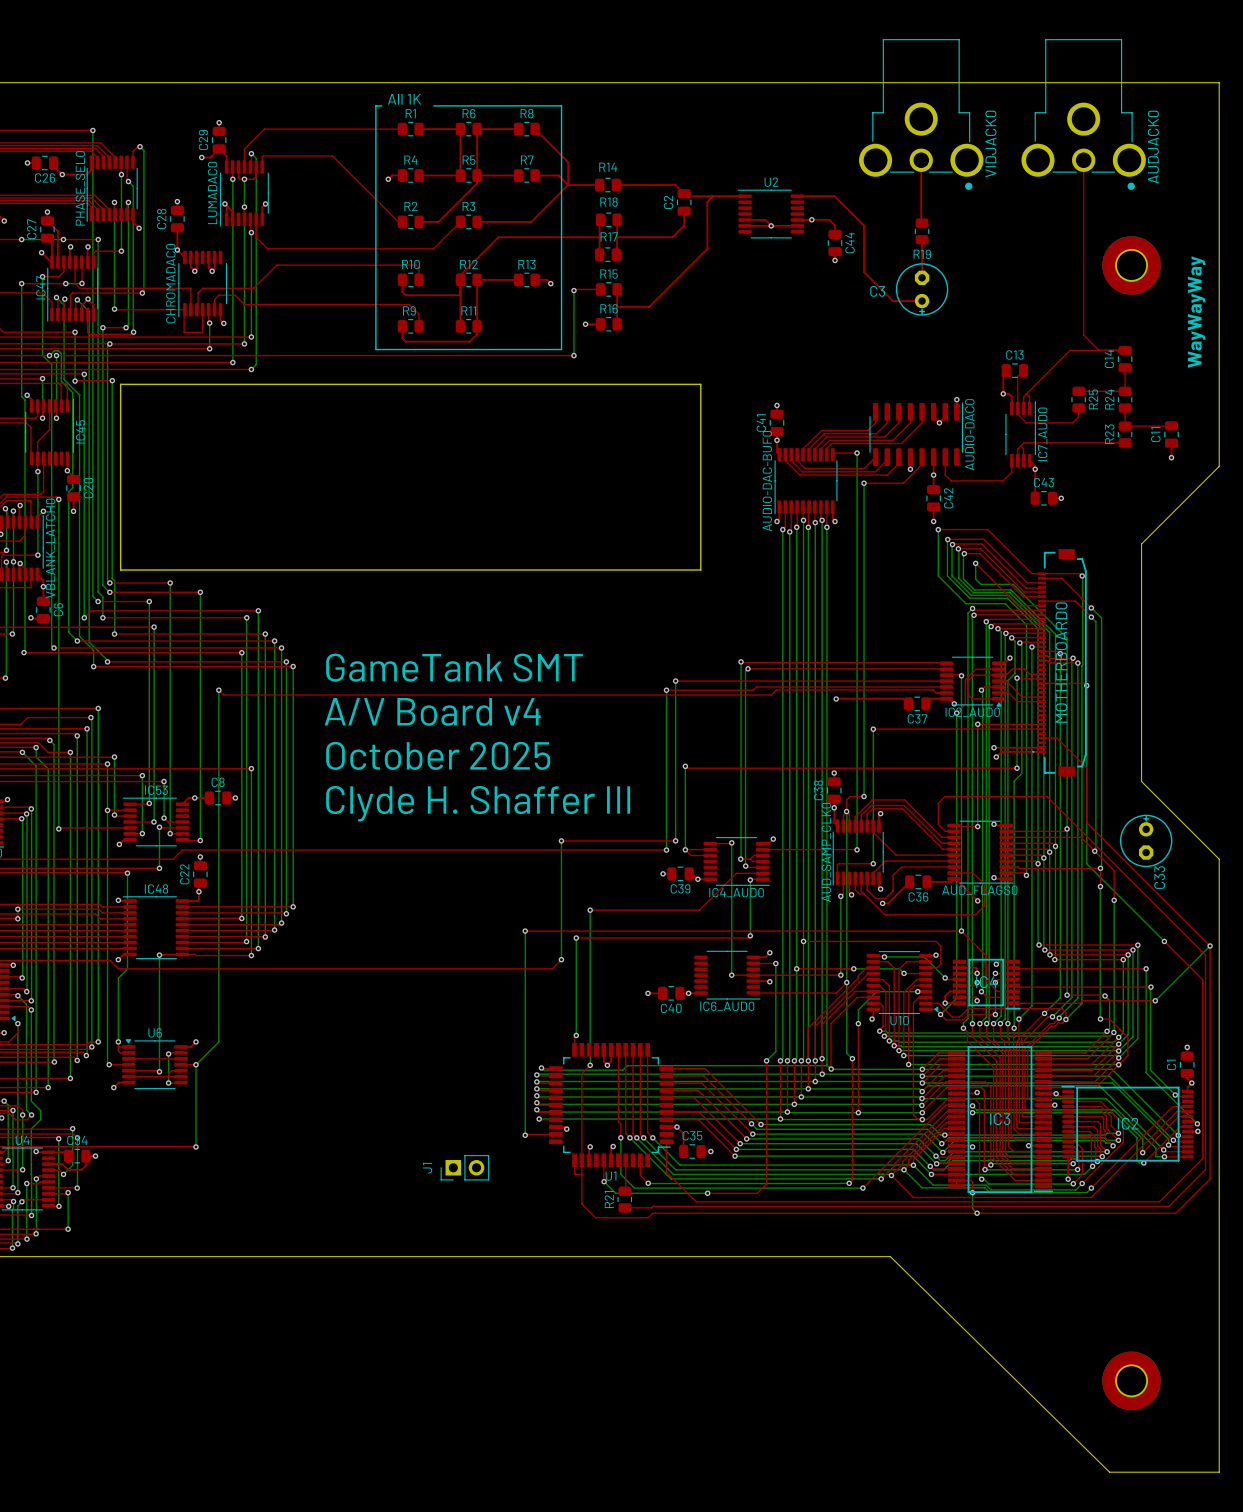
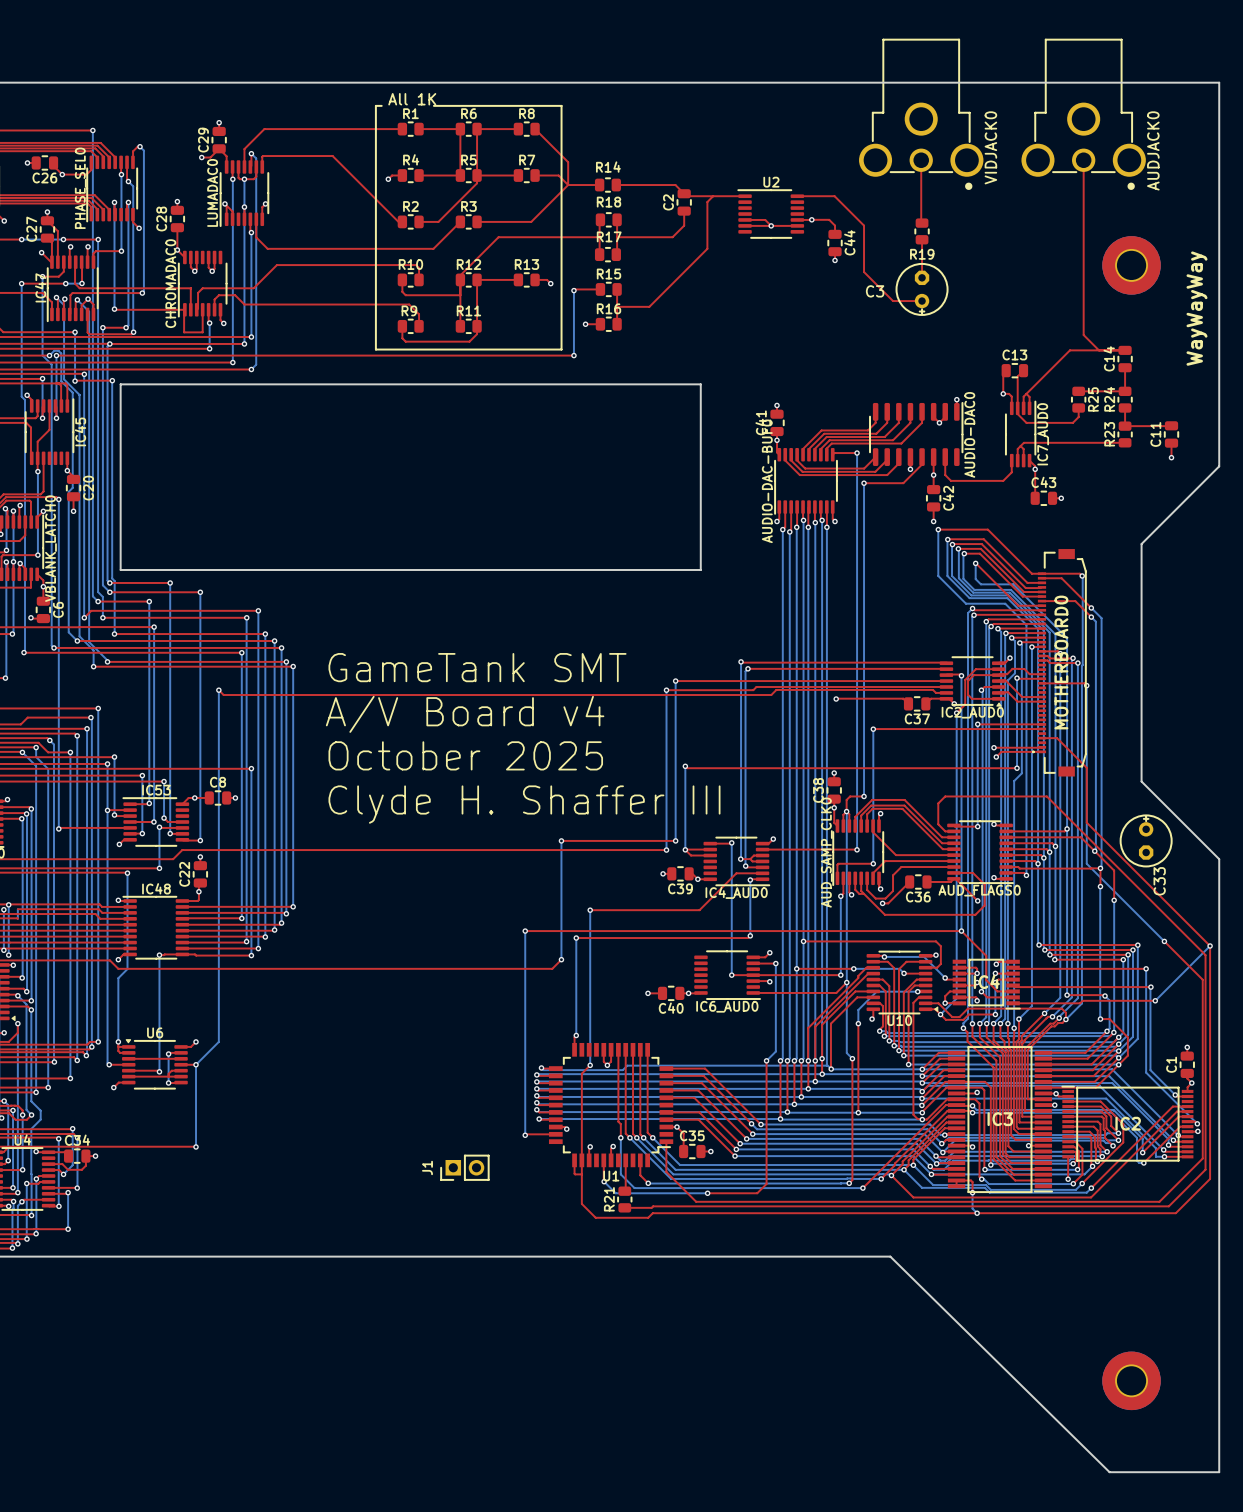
bottom track: none -> (8, 904) (8, 955)
via: none -> (8, 904)
bottom track: none -> (3, 909) (3, 950)
via: none -> (3, 909)
via: (17, 909) -> none
via: (17, 918) -> none
via: none -> (3, 950)
via: none -> (8, 955)

